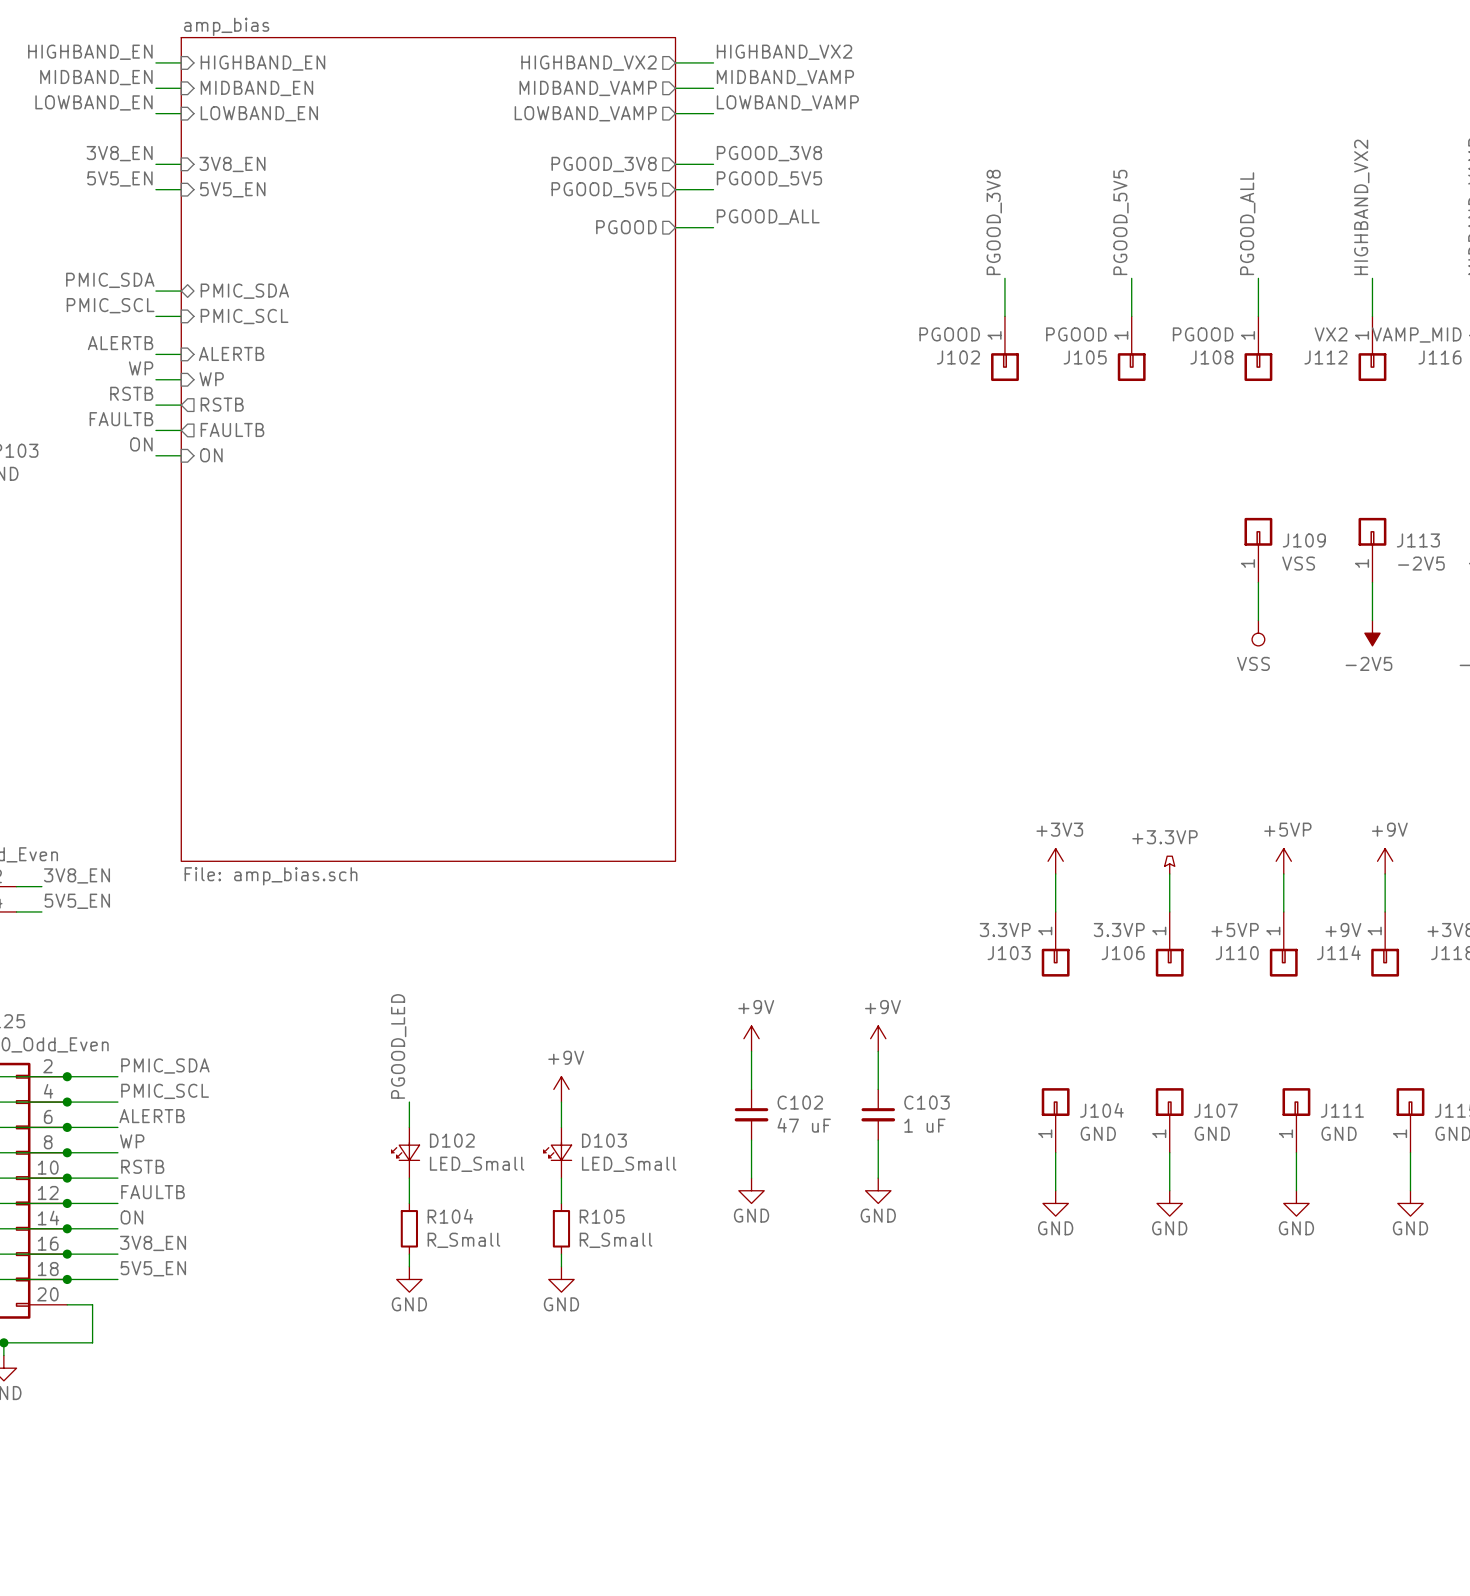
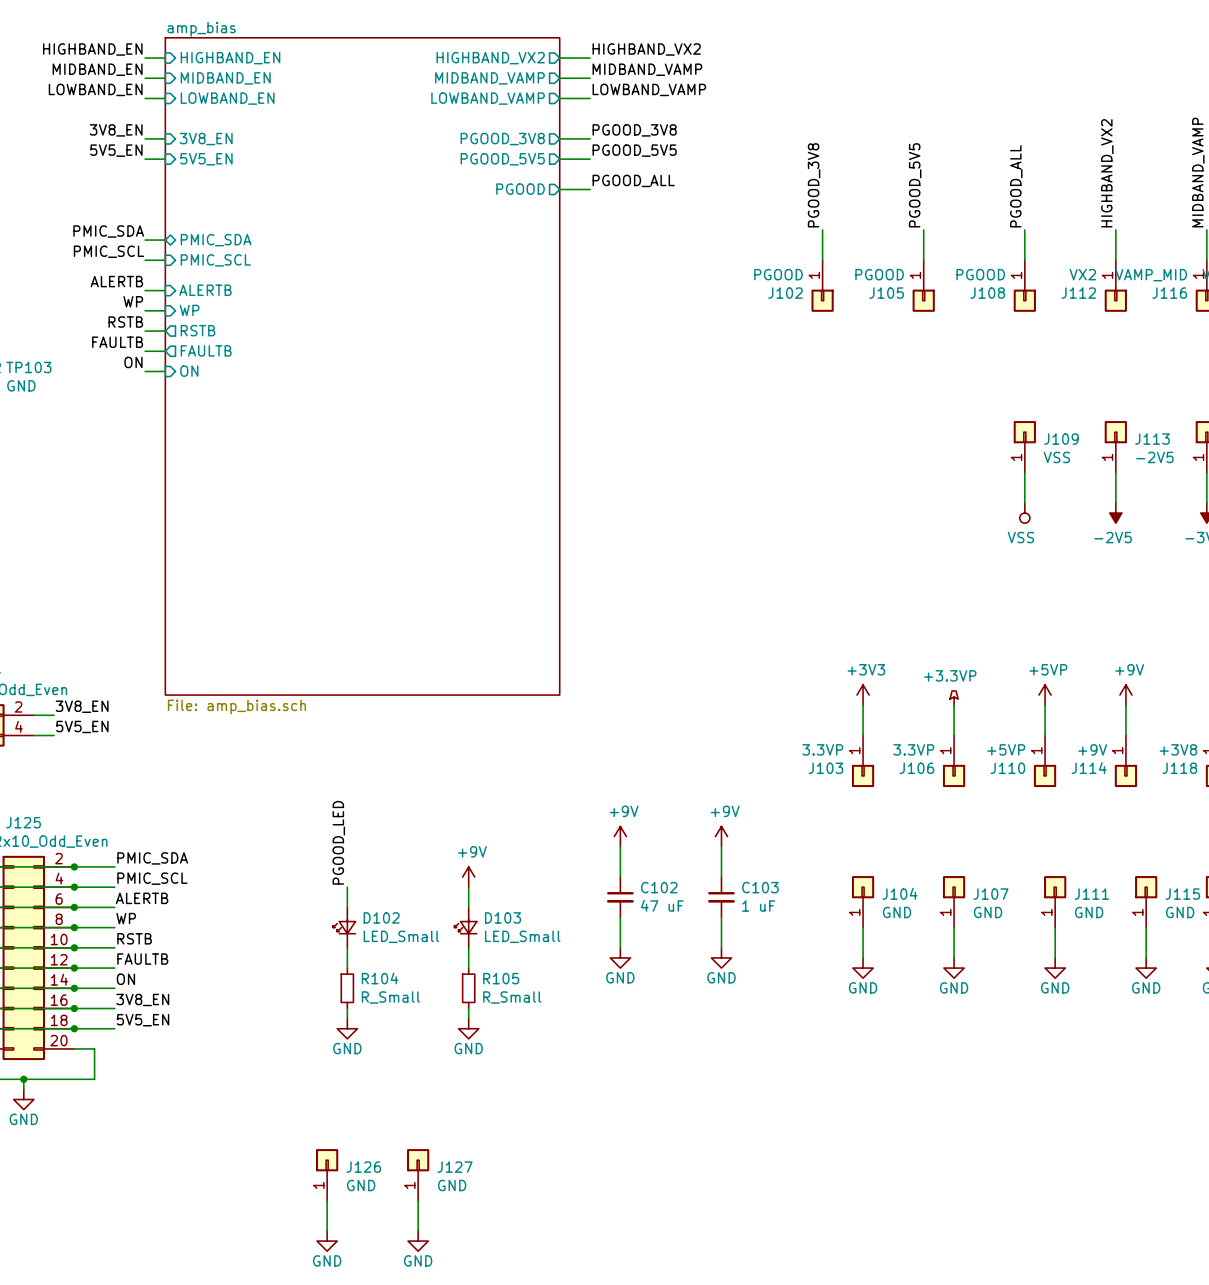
J126: none -> GND (327, 1174)
J127: none -> GND (418, 1174)
wire: none -> (327, 1200) (327, 1230)
wire: none -> (418, 1200) (418, 1230)
power symbol: none -> GND (327, 1241)
power symbol: none -> GND (418, 1241)

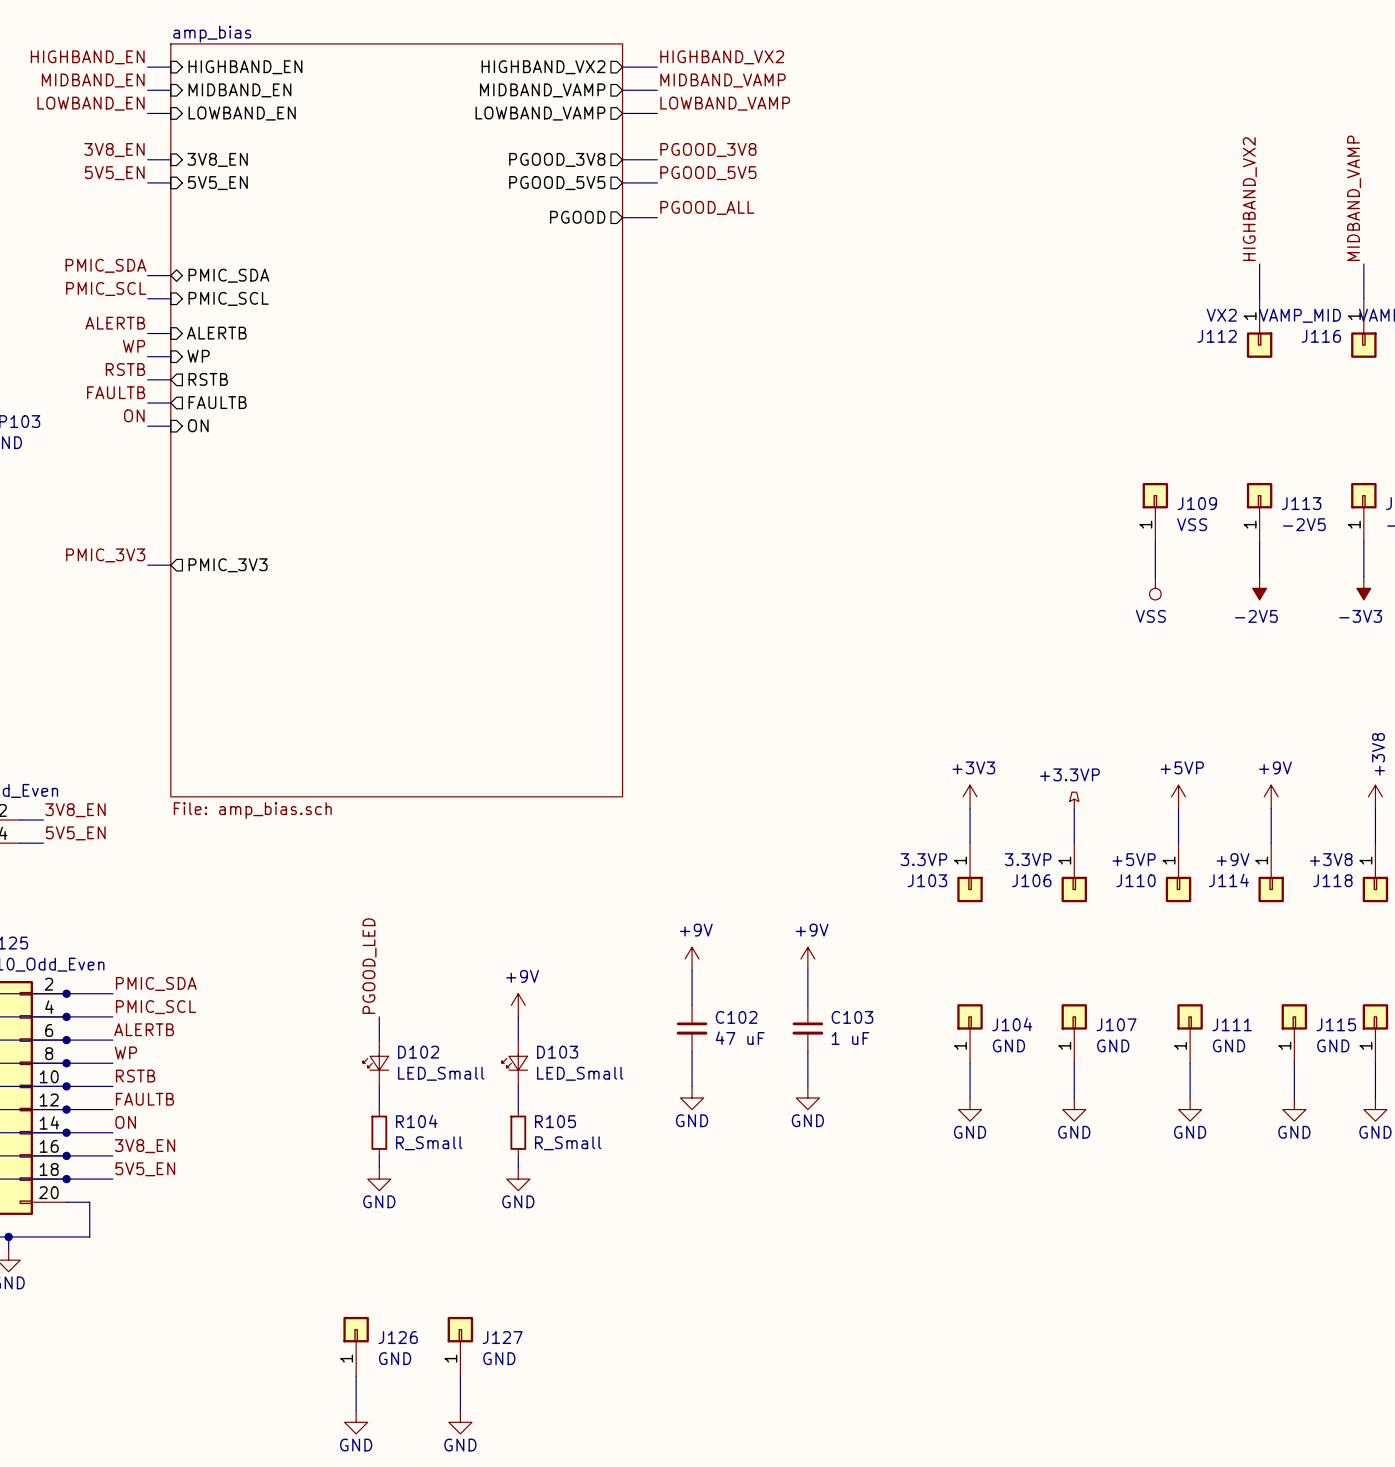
label: PGOOD_3V8 (814, 185) -> none
label: PGOOD_5V5 (915, 185) -> none
label: PGOOD_ALL (1016, 186) -> none
wire: (822, 229) (822, 260) -> none
wire: (923, 229) (923, 260) -> none
wire: (1024, 229) (1024, 260) -> none
J102: PGOOD (822, 286) -> none
J105: PGOOD (923, 286) -> none
J108: PGOOD (1024, 286) -> none
label: none -> PMIC_3V3 (105, 555)
wire: none -> (147, 565) (170, 565)
sheet pin: none -> PMIC_3V3 (228, 565)

